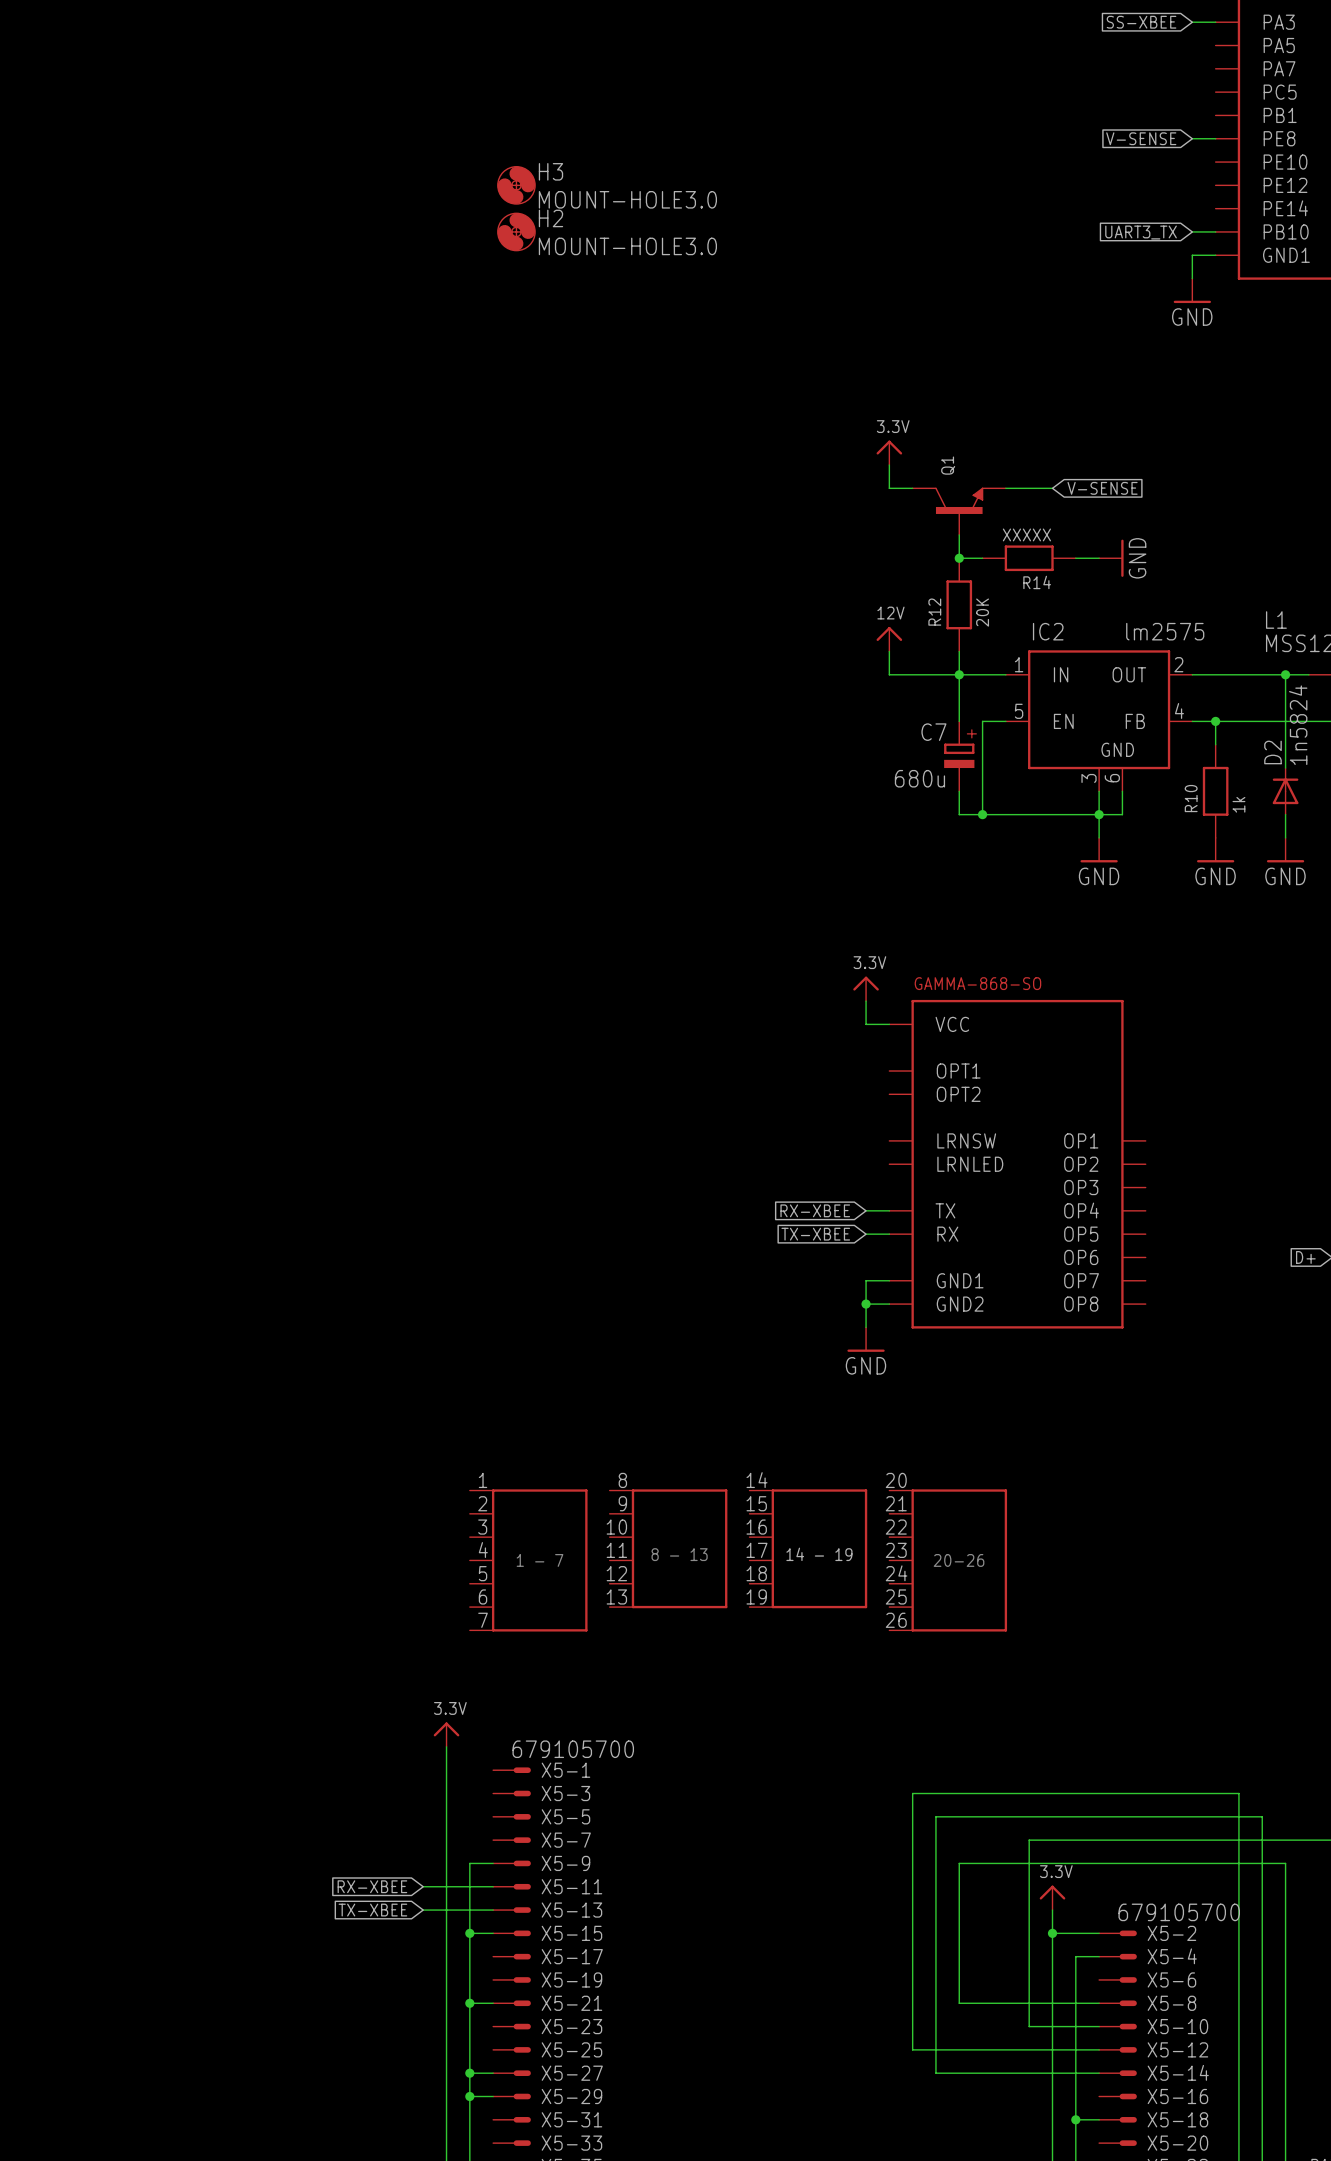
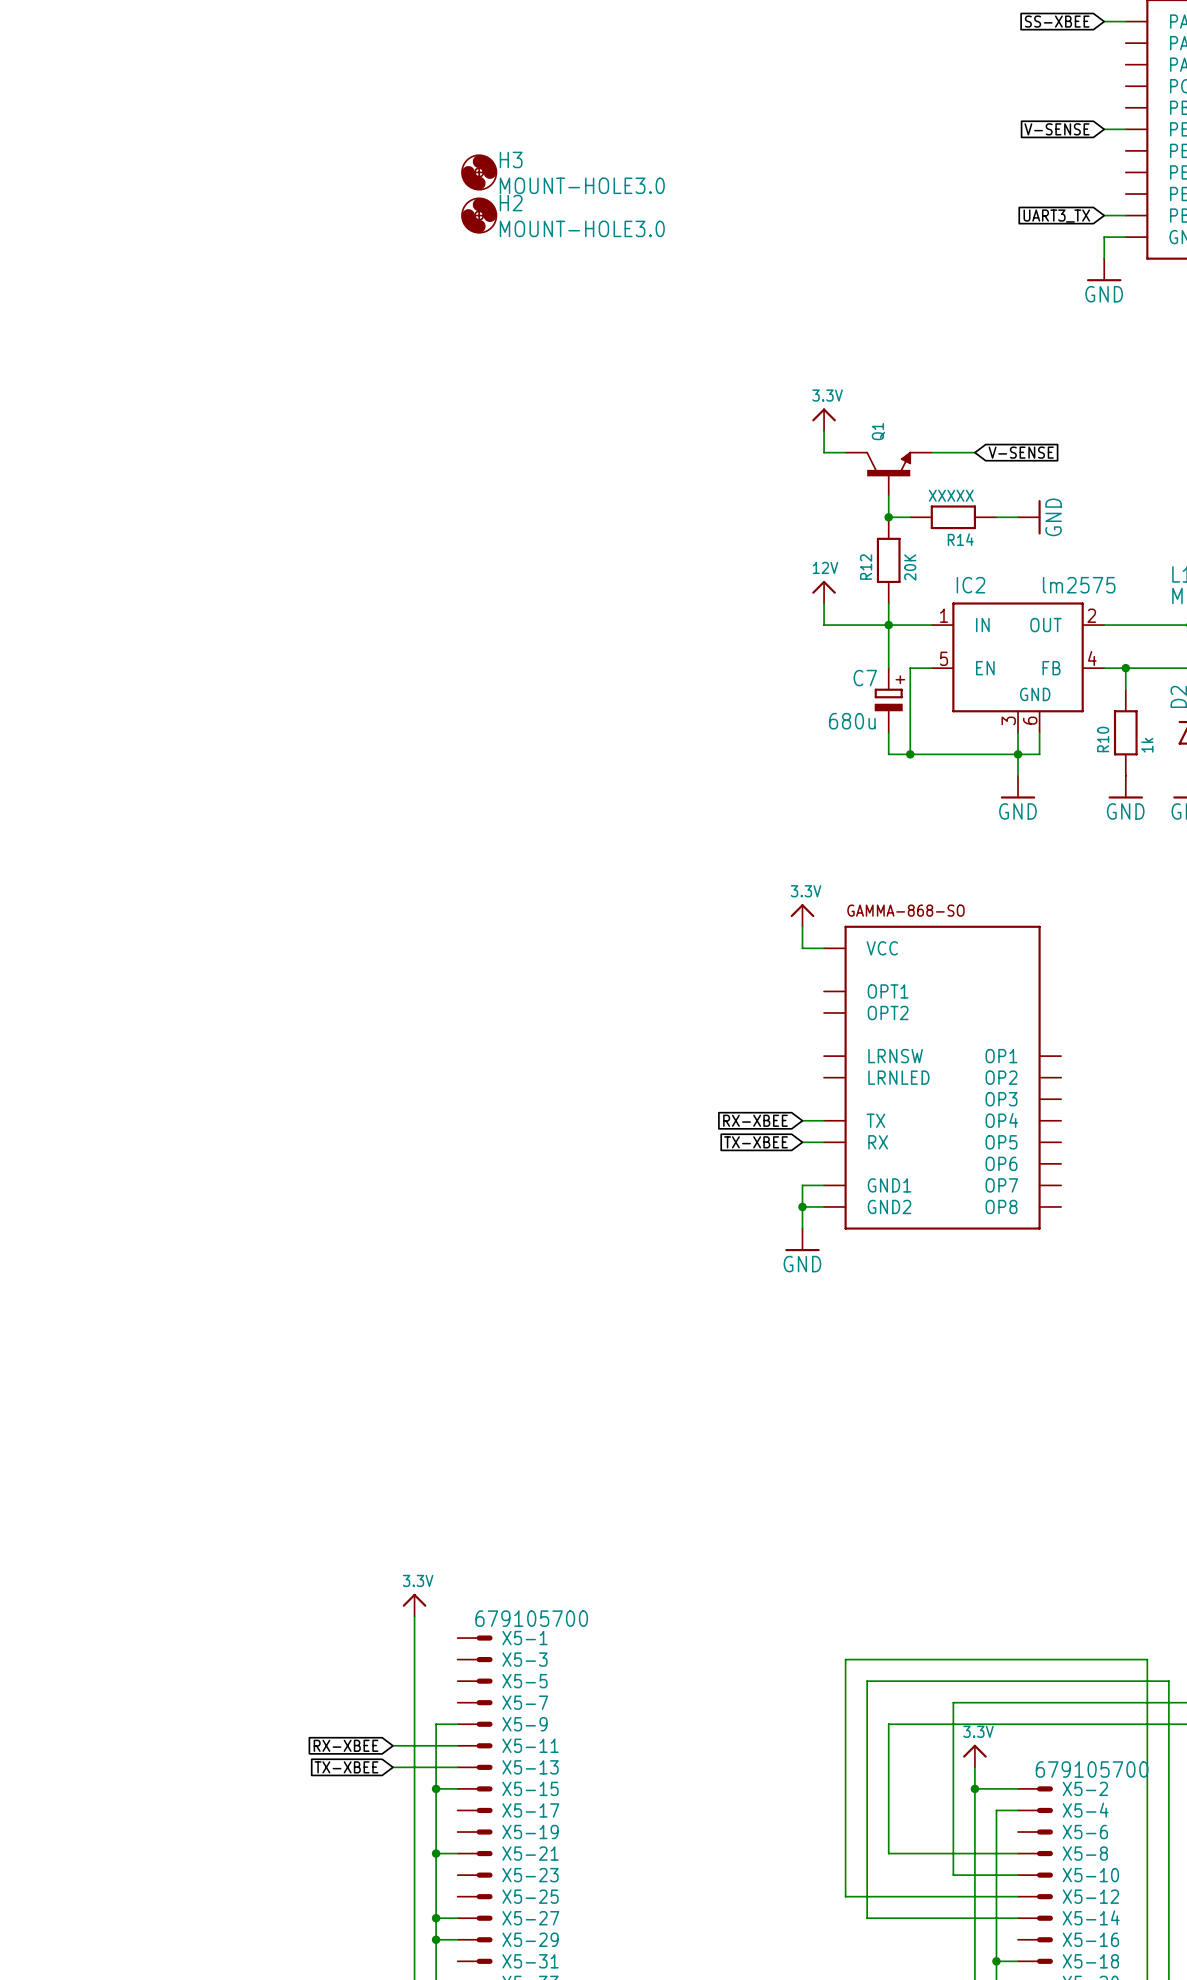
part: (668, 1548) -> none
part: (808, 1548) -> none
part: (528, 1560) -> none
part: (948, 1560) -> none

